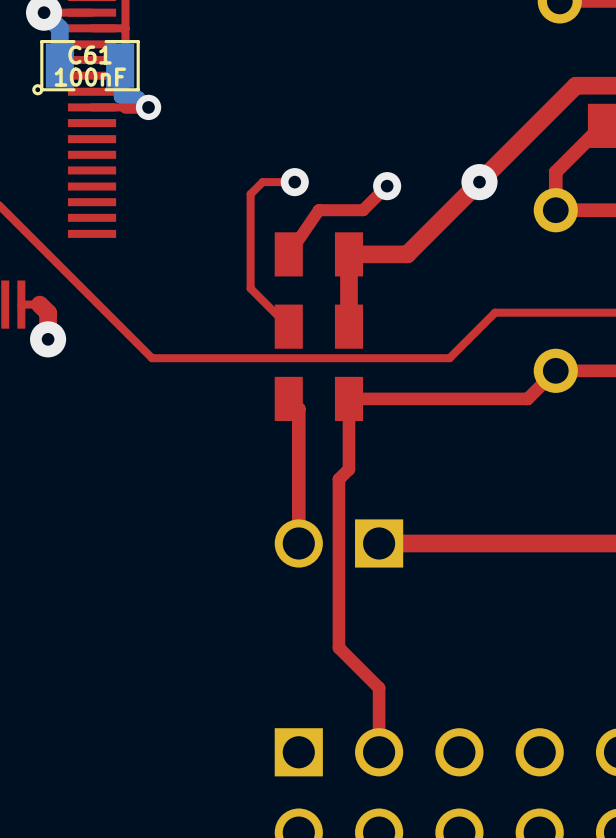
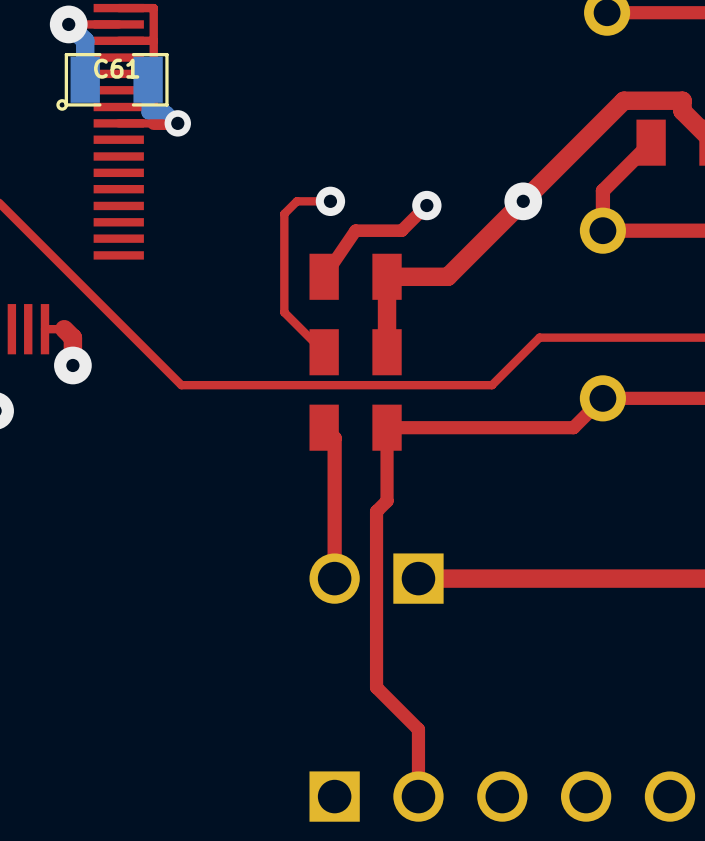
C61 value: 100nF (90, 77) -> none

